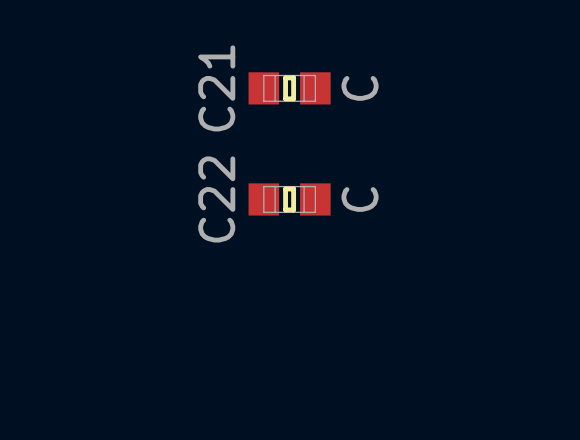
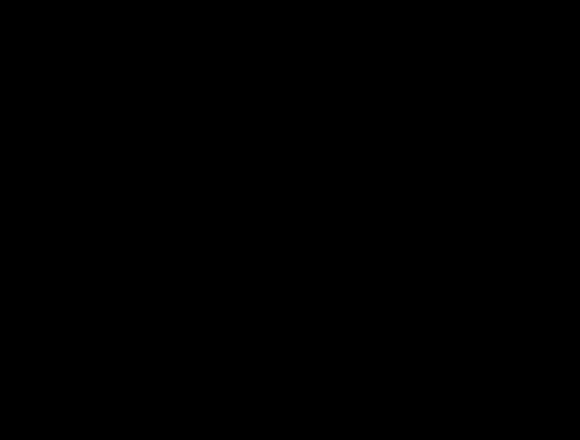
C21: C (289, 88) -> none
C22: C (289, 199) -> none

